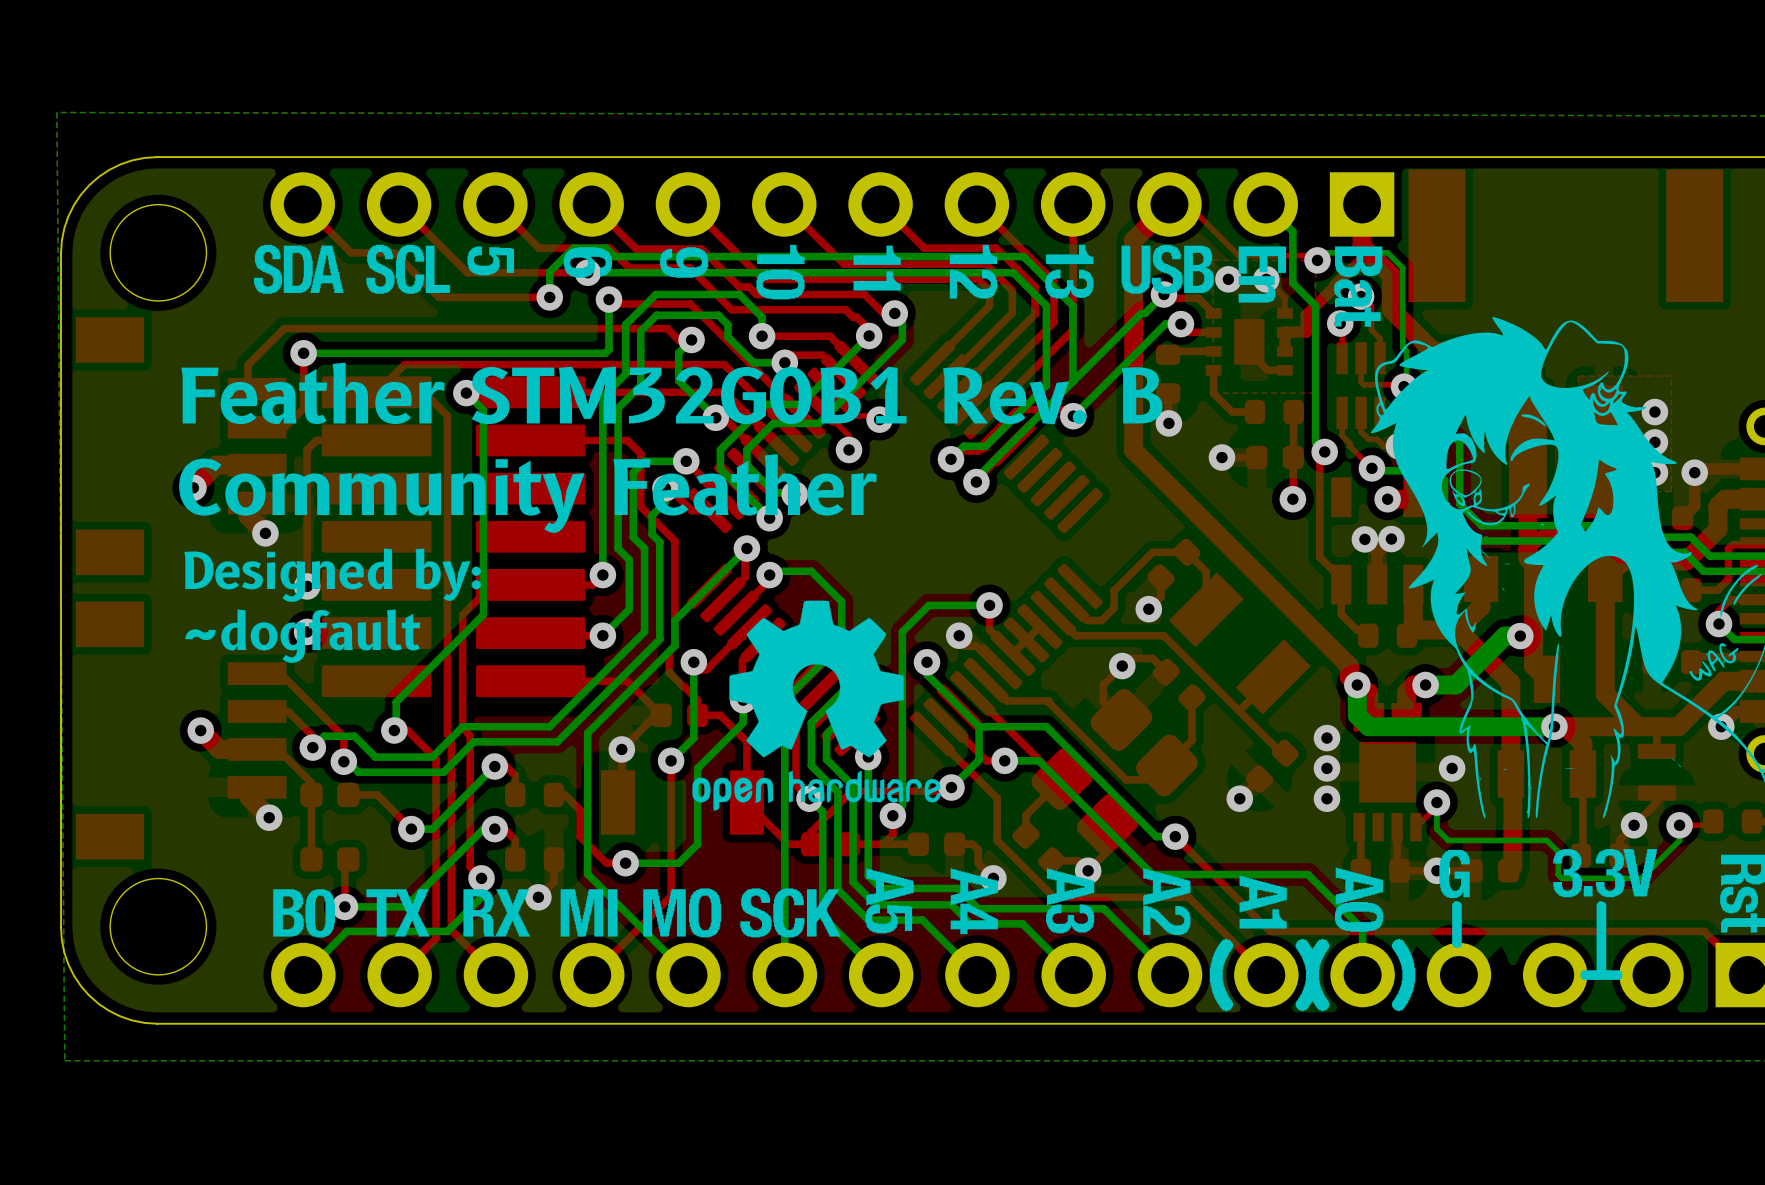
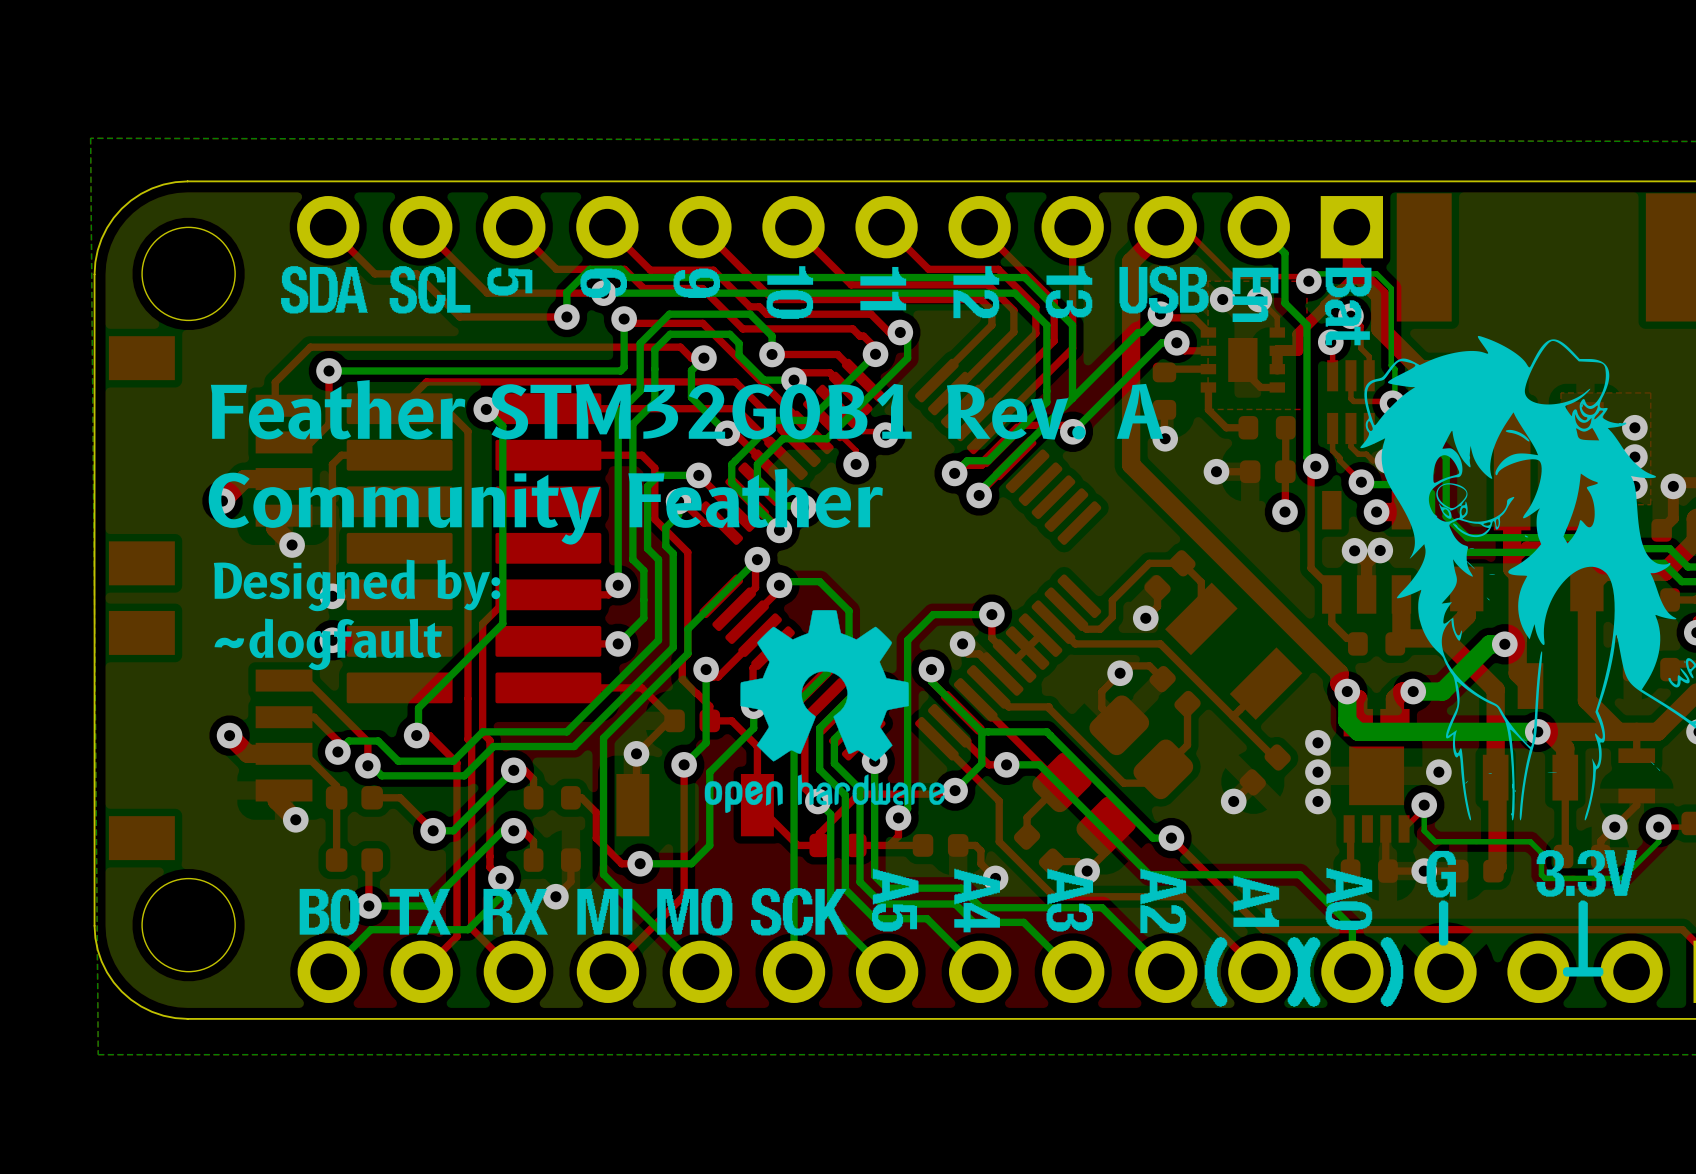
text: Feather STM32G0B1 Rev. B (671, 393) -> Feather STM32G0B1 Rev. A (687, 409)

